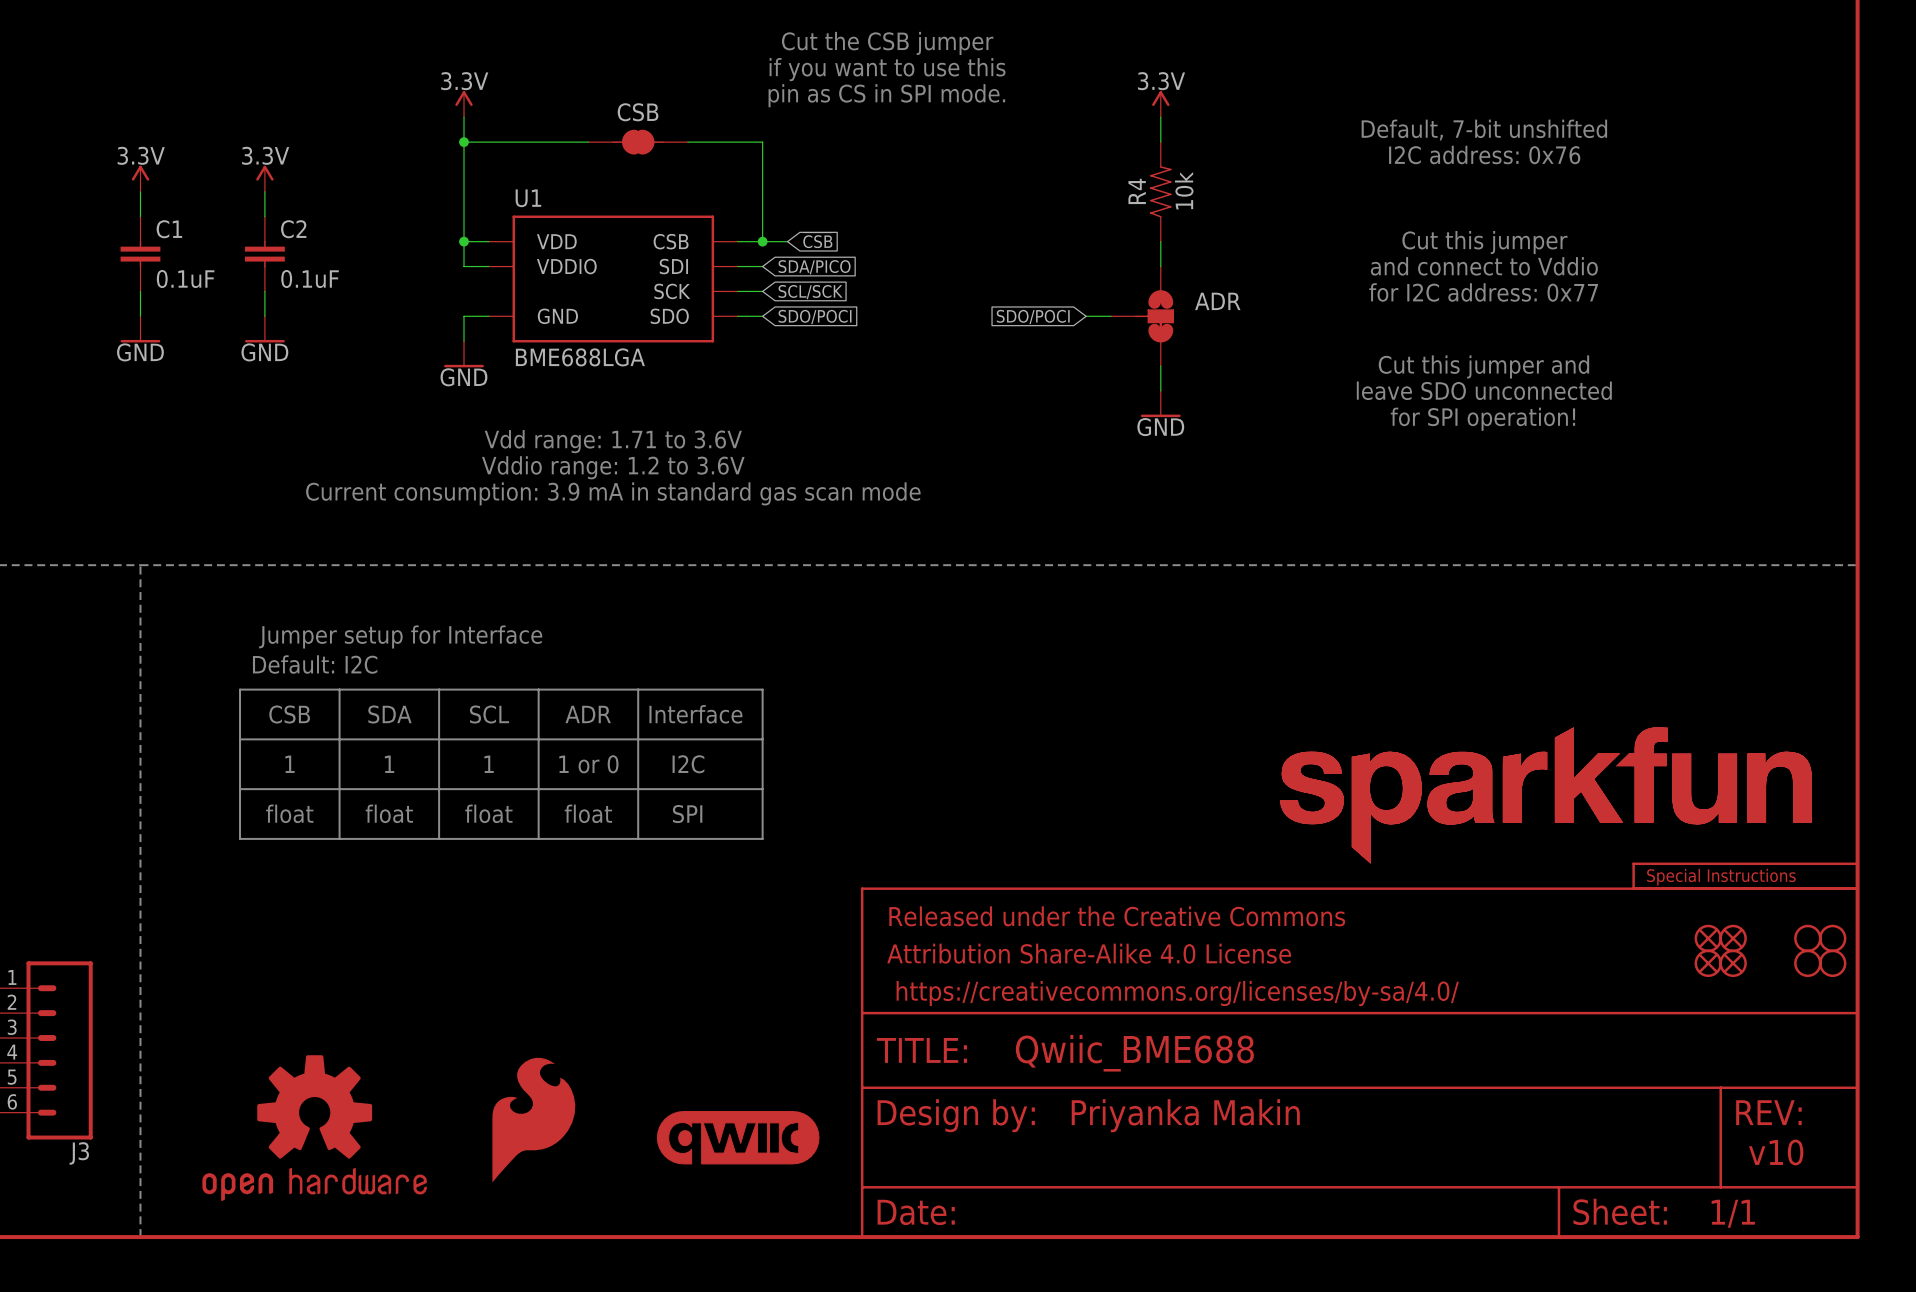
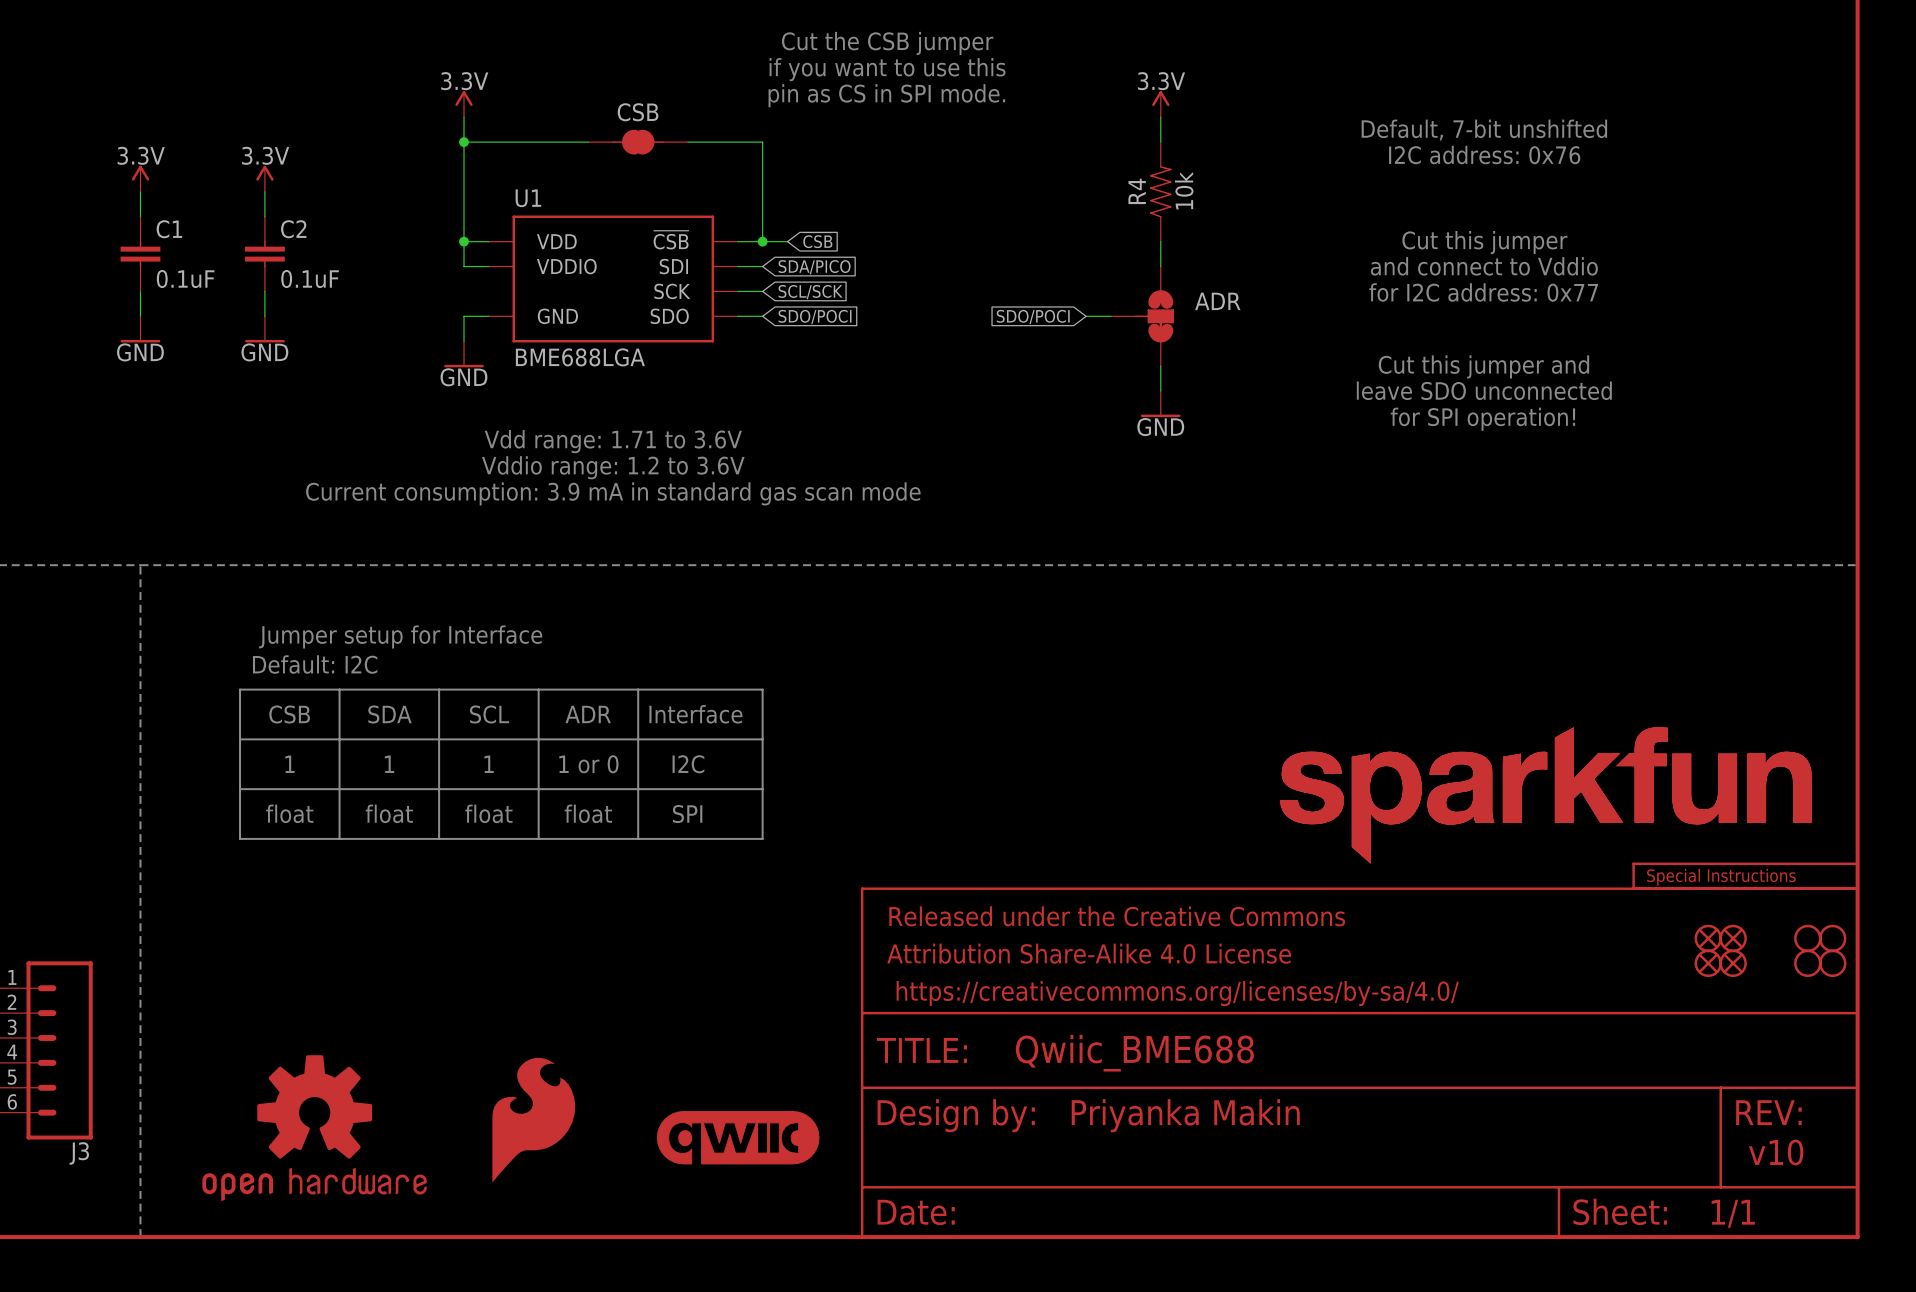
U1 pin name: CSB (671, 241) -> ~{CSB} (671, 240)

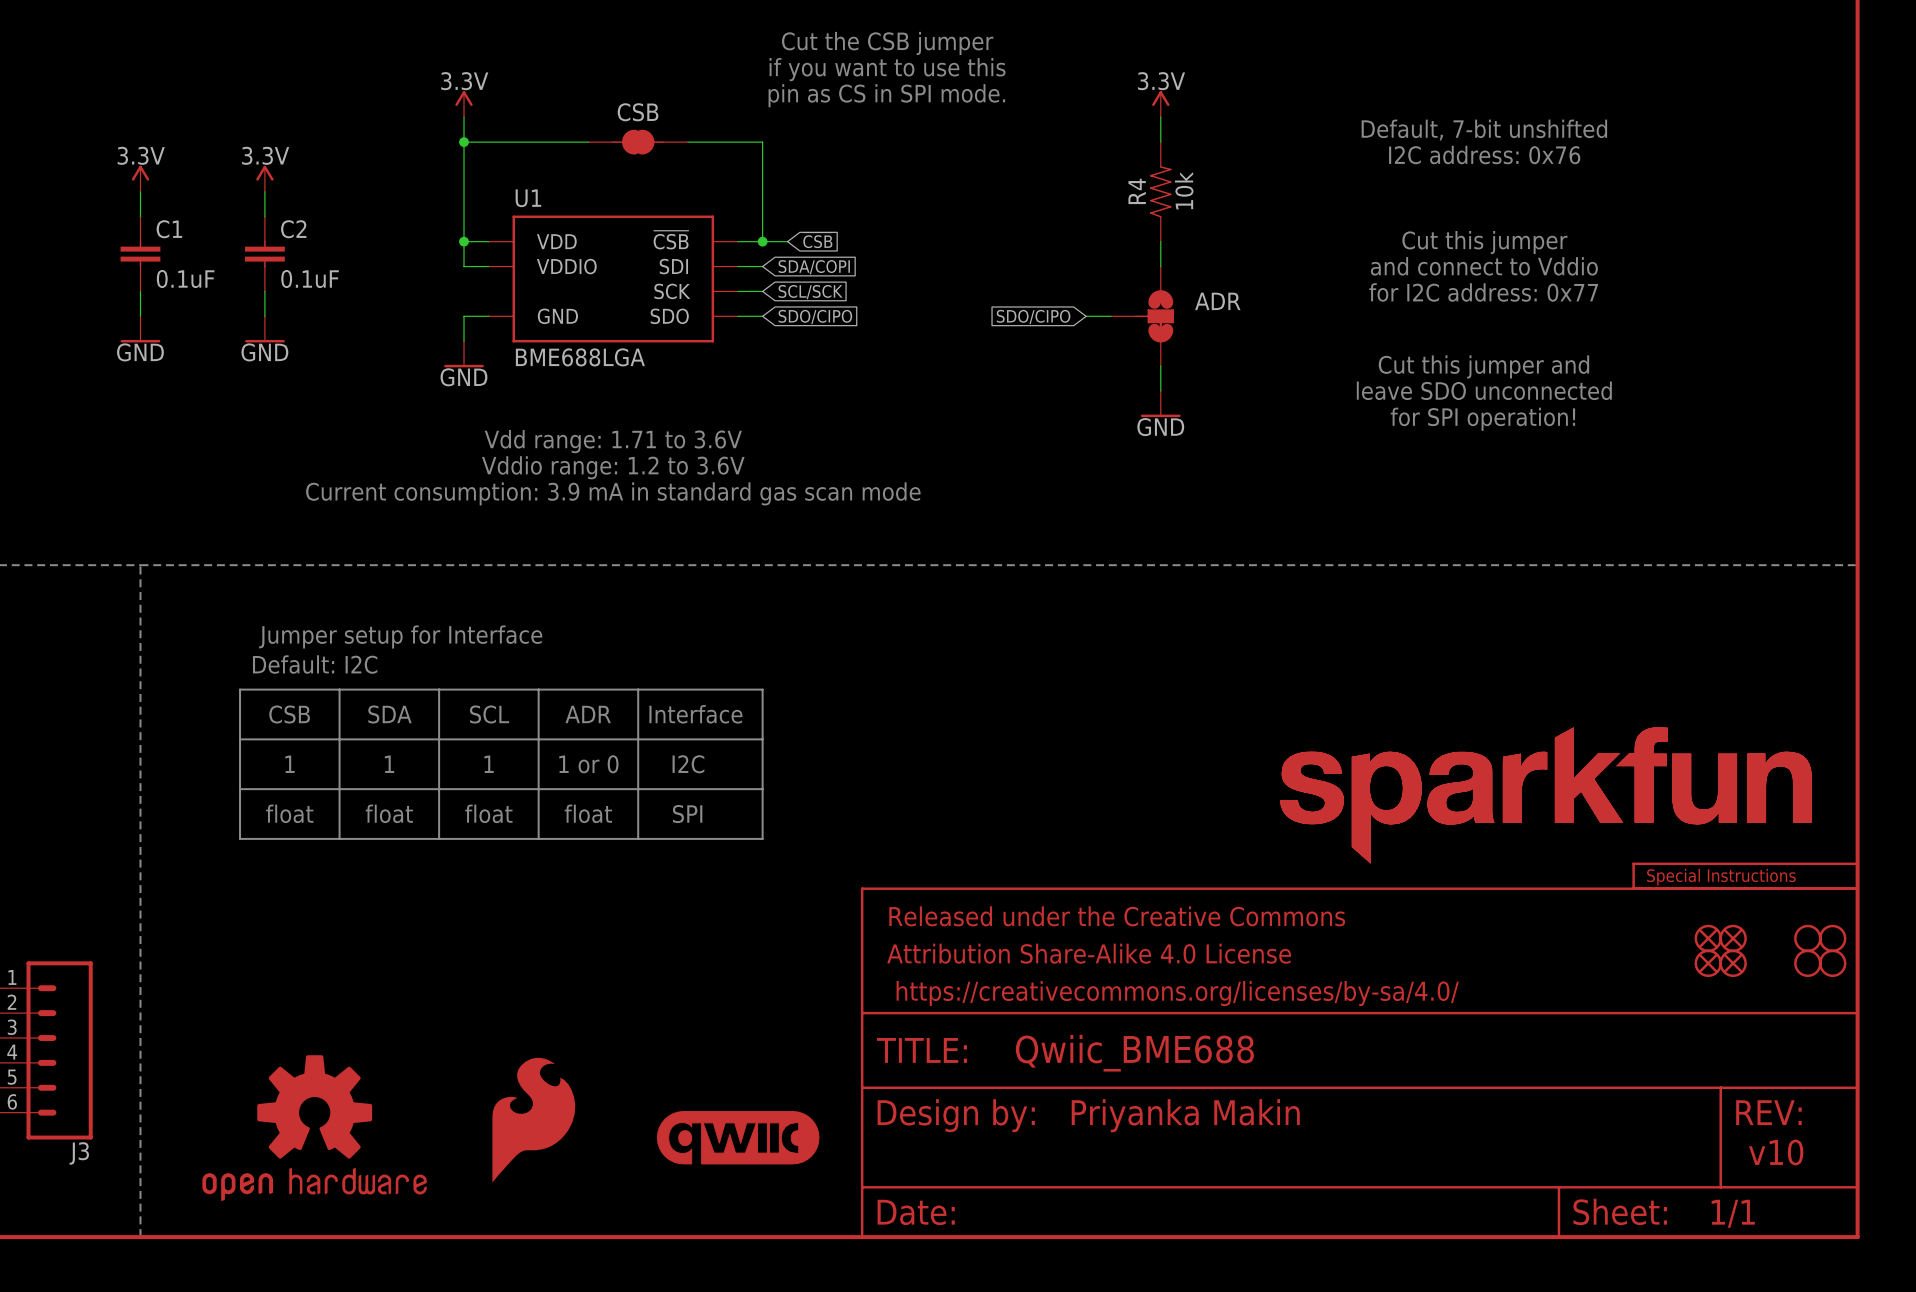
global label: SDA/PICO (814, 267) -> SDA/COPI (814, 267)
global label: SDO/POCI (815, 316) -> SDO/CIPO (815, 316)
global label: SDO/POCI (1033, 316) -> SDO/CIPO (1033, 316)

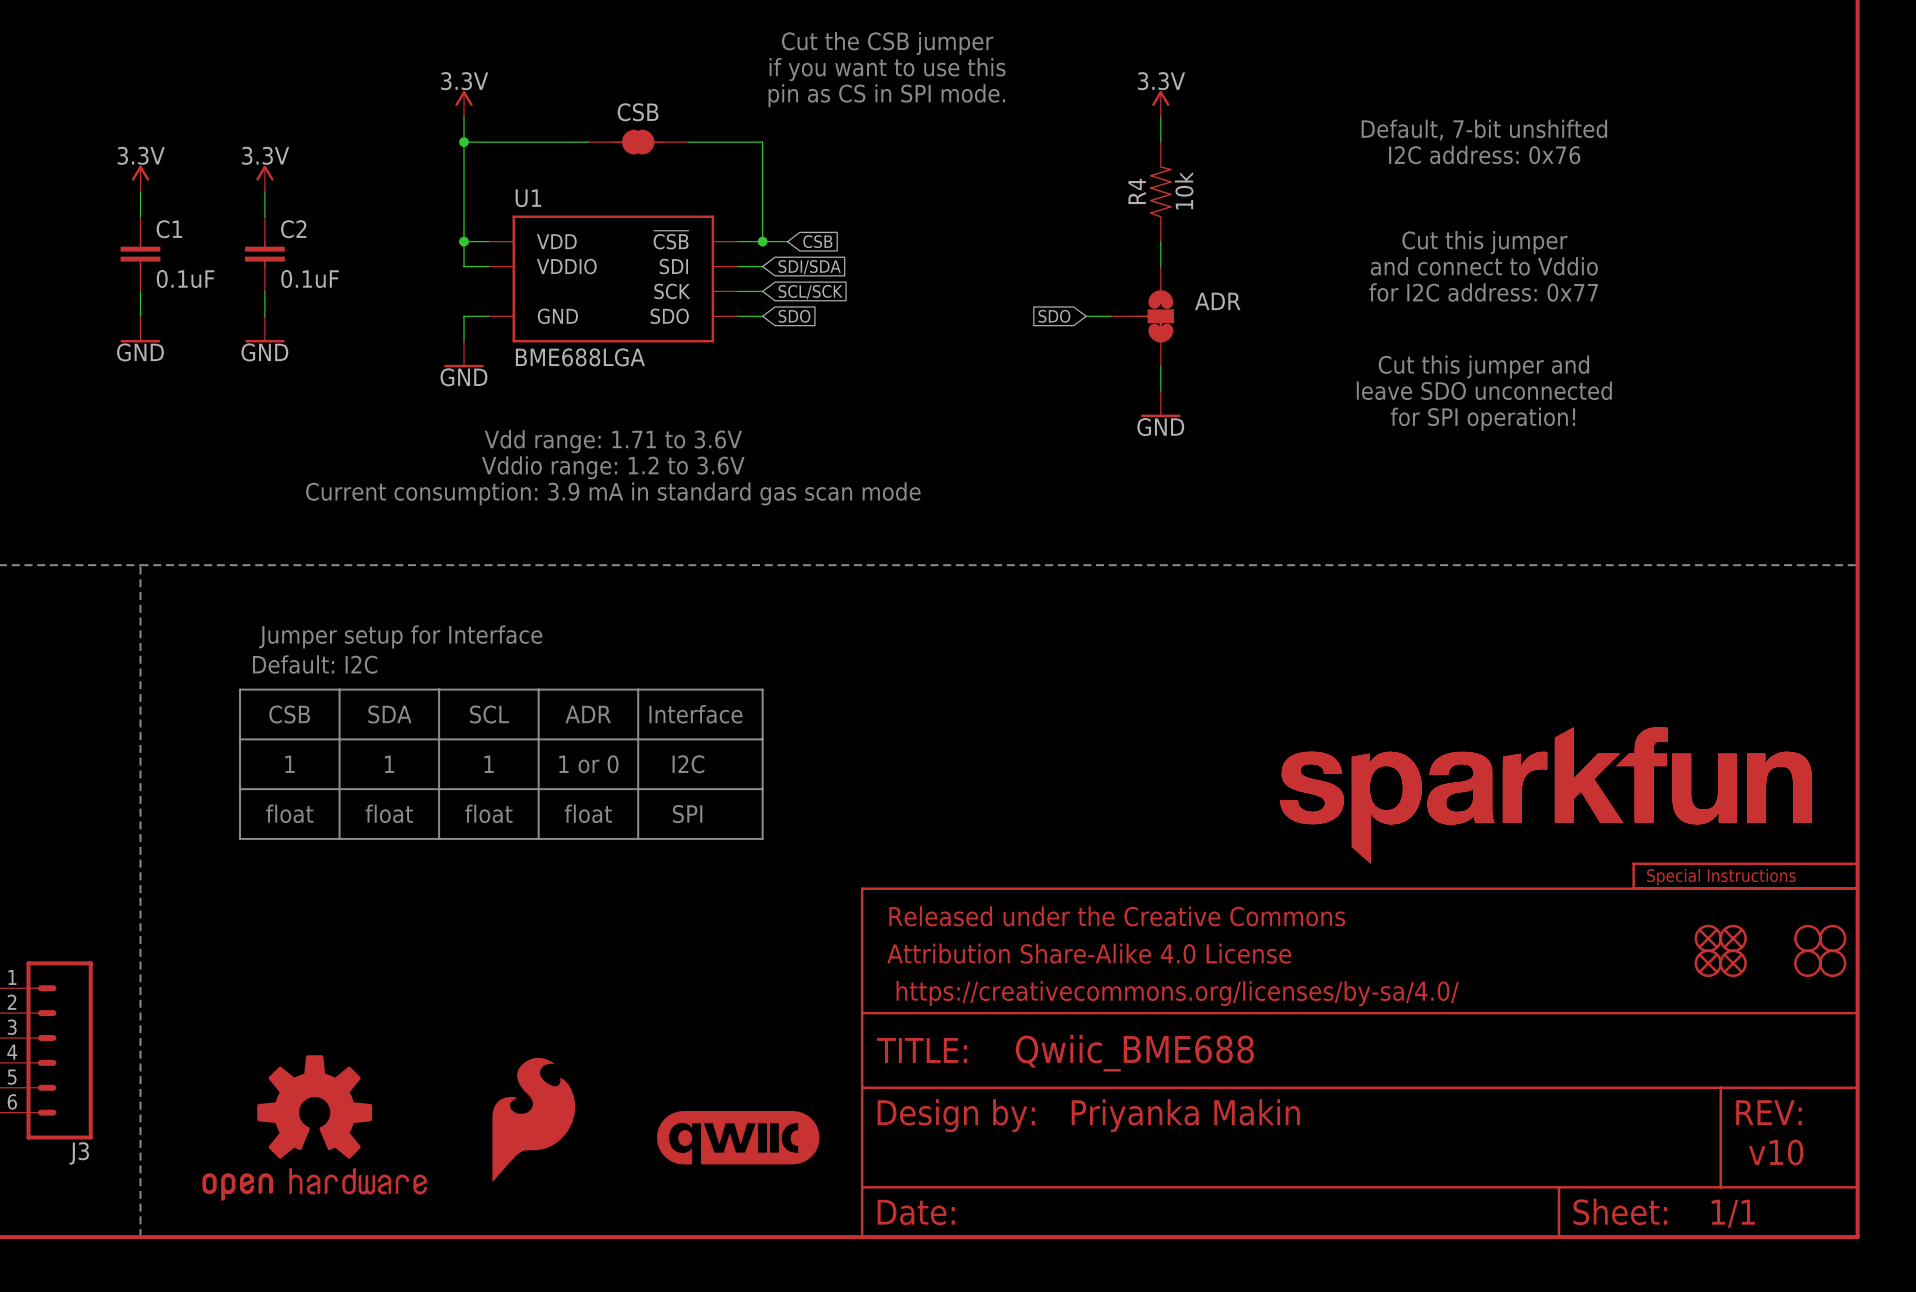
global label: SDA/COPI (814, 267) -> SDI/SDA (809, 267)
global label: SDO/CIPO (815, 316) -> SDO (794, 316)
global label: SDO/CIPO (1033, 316) -> SDO (1054, 316)

